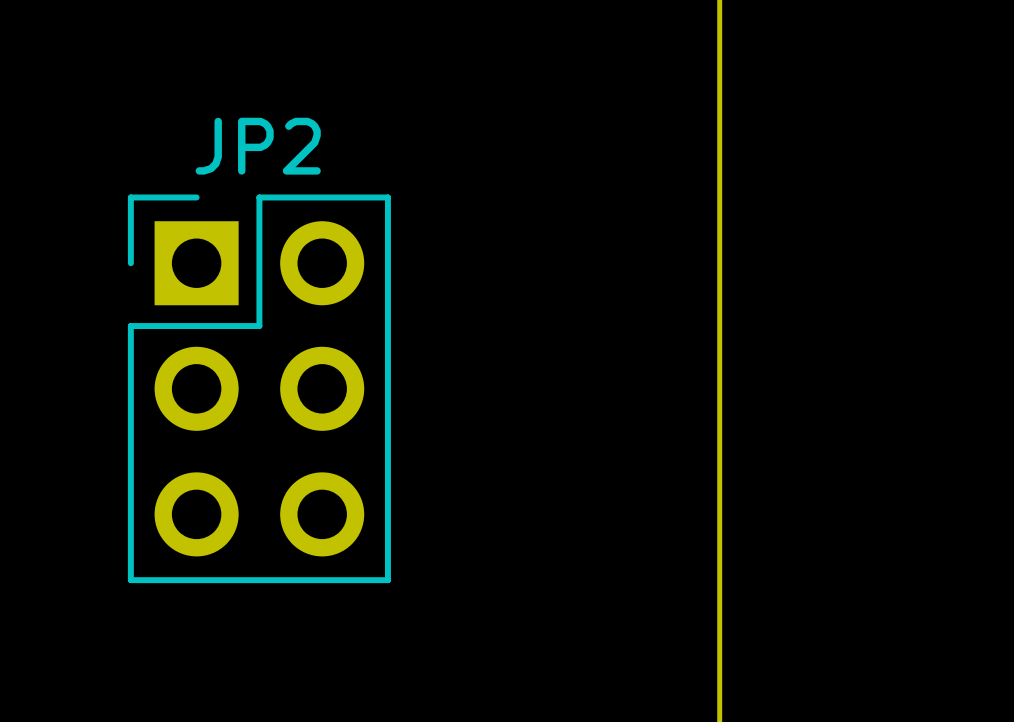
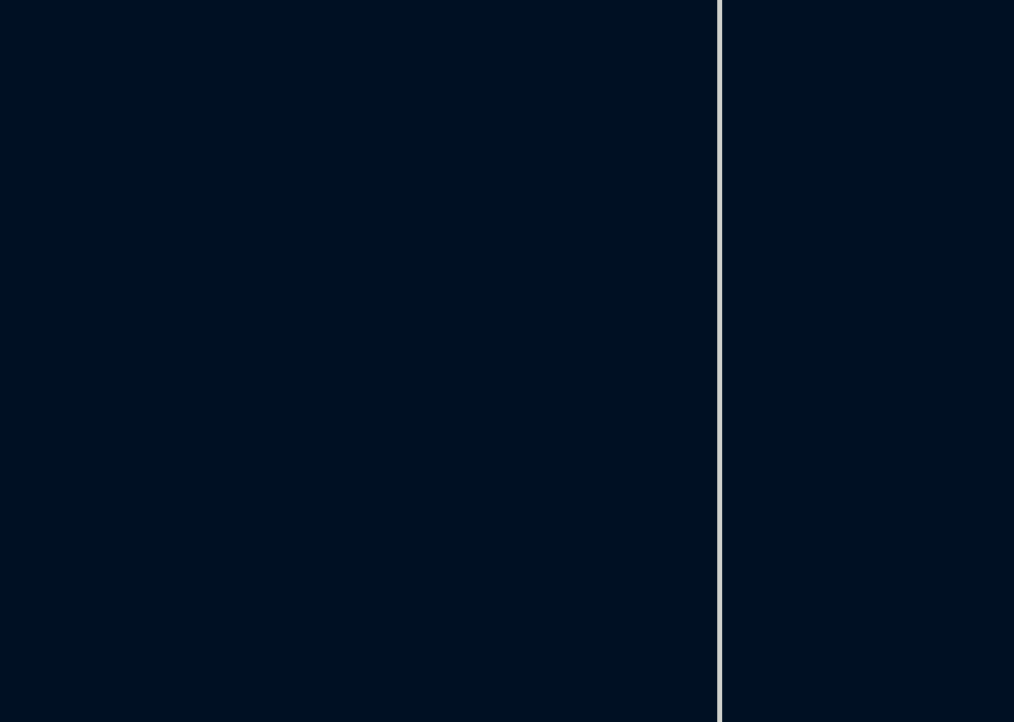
JP2: (259, 388) -> none

